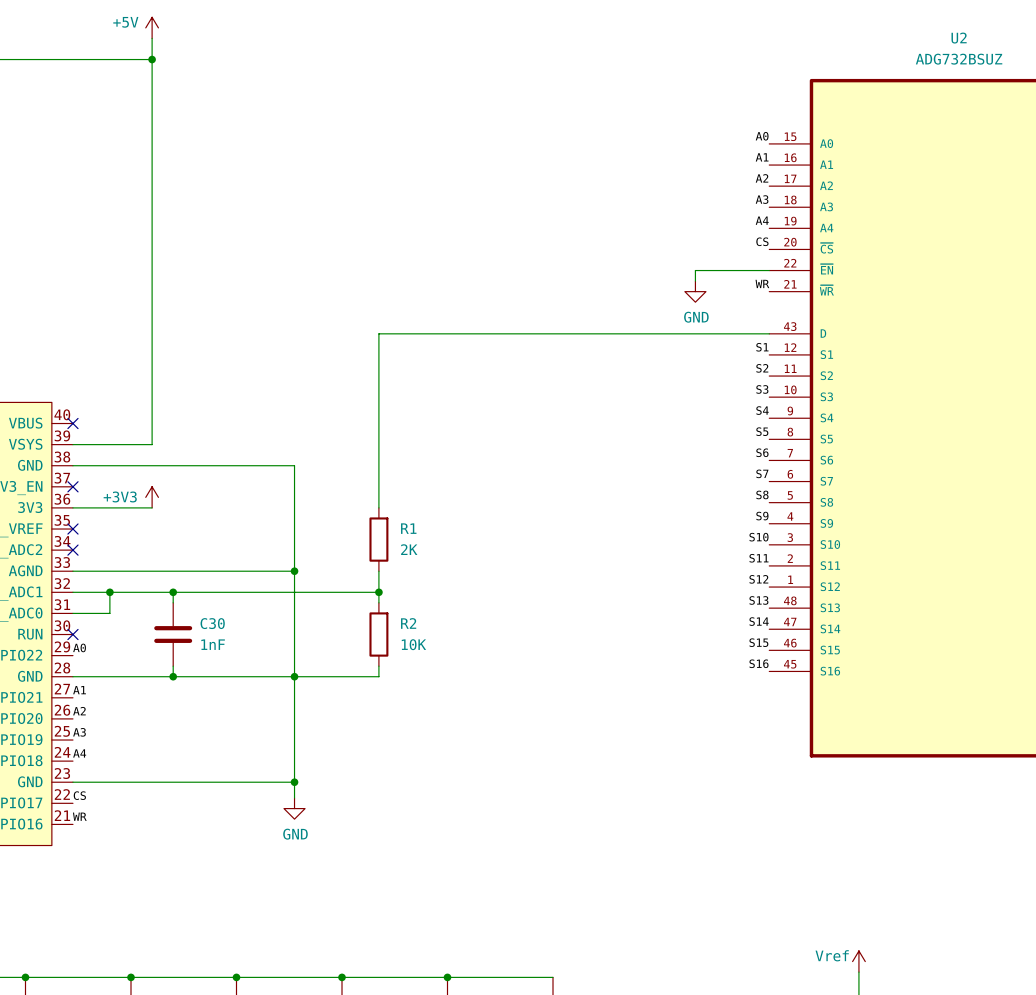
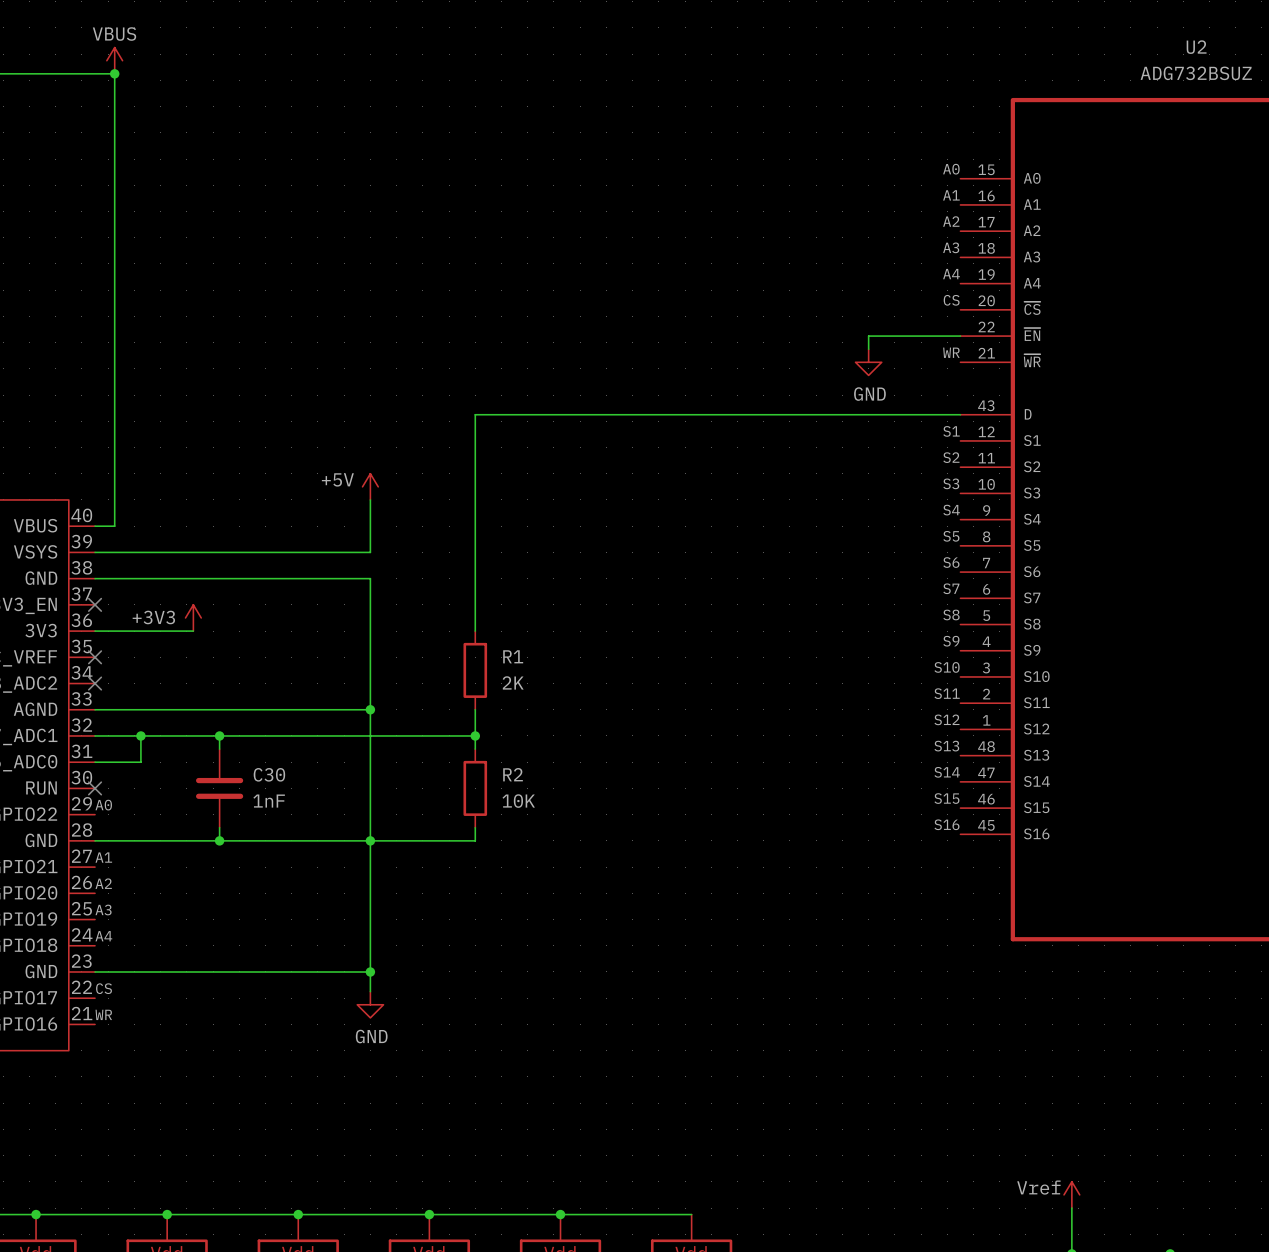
power symbol: +5V (152, 27) -> none
wire: (152, 38) (152, 444) -> (370, 499) (370, 552) (193, 552)
power symbol: none -> VBUS (114, 60)
wire: (88, 59) (152, 59) -> (114, 73) (114, 526) (95, 526)
junction: none -> (114, 73)
junction: (152, 59) -> none
power symbol: none -> +5V (370, 486)
no-connect mark: (72, 423) -> none

